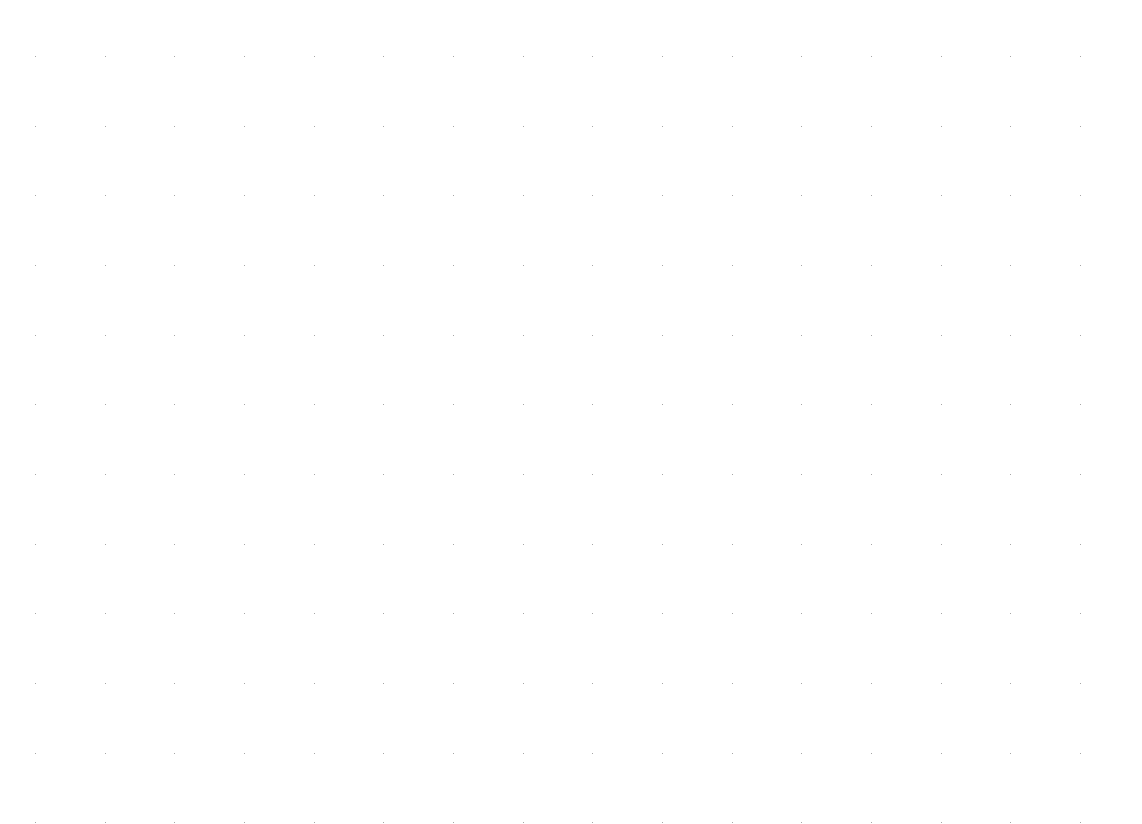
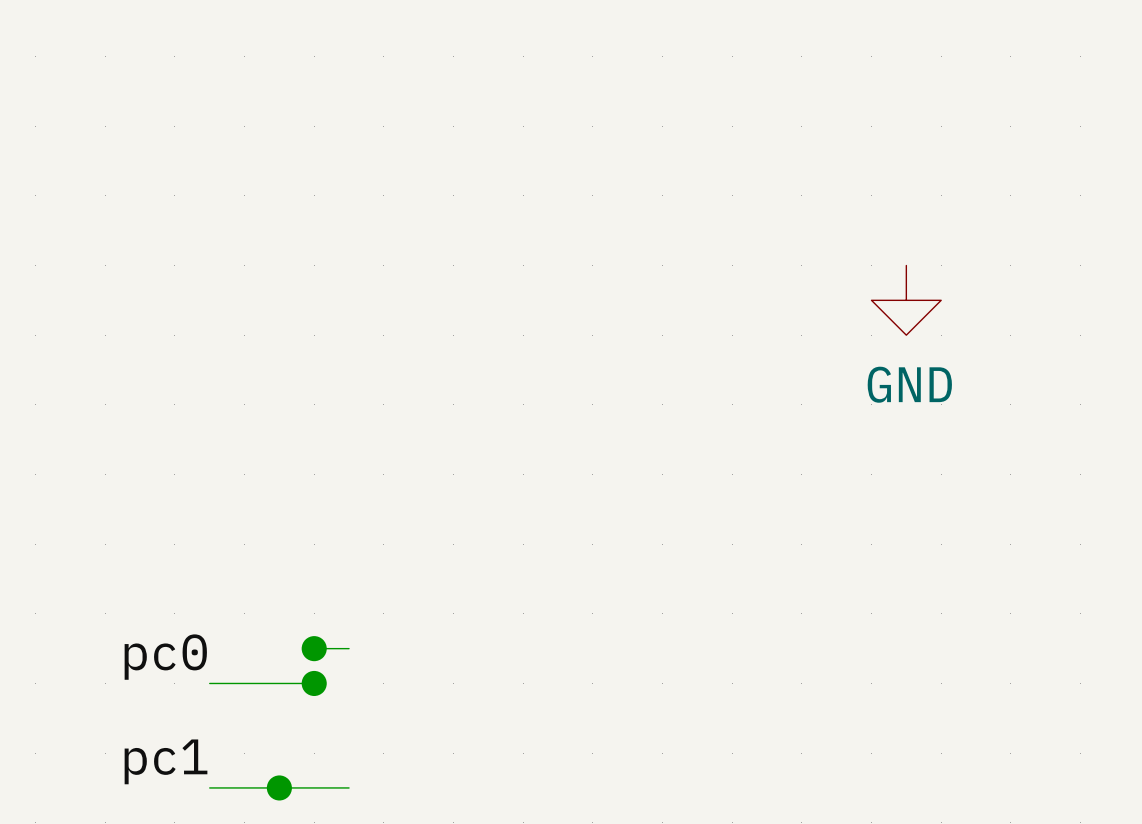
power symbol: none -> GND (906, 300)
wire: none -> (314, 648) (349, 648)
junction: none -> (314, 648)
label: none -> pc0 (165, 657)
wire: none -> (209, 683) (314, 683)
junction: none -> (314, 683)
label: none -> pc1 (166, 761)
wire: none -> (209, 787) (349, 787)
junction: none -> (279, 787)

